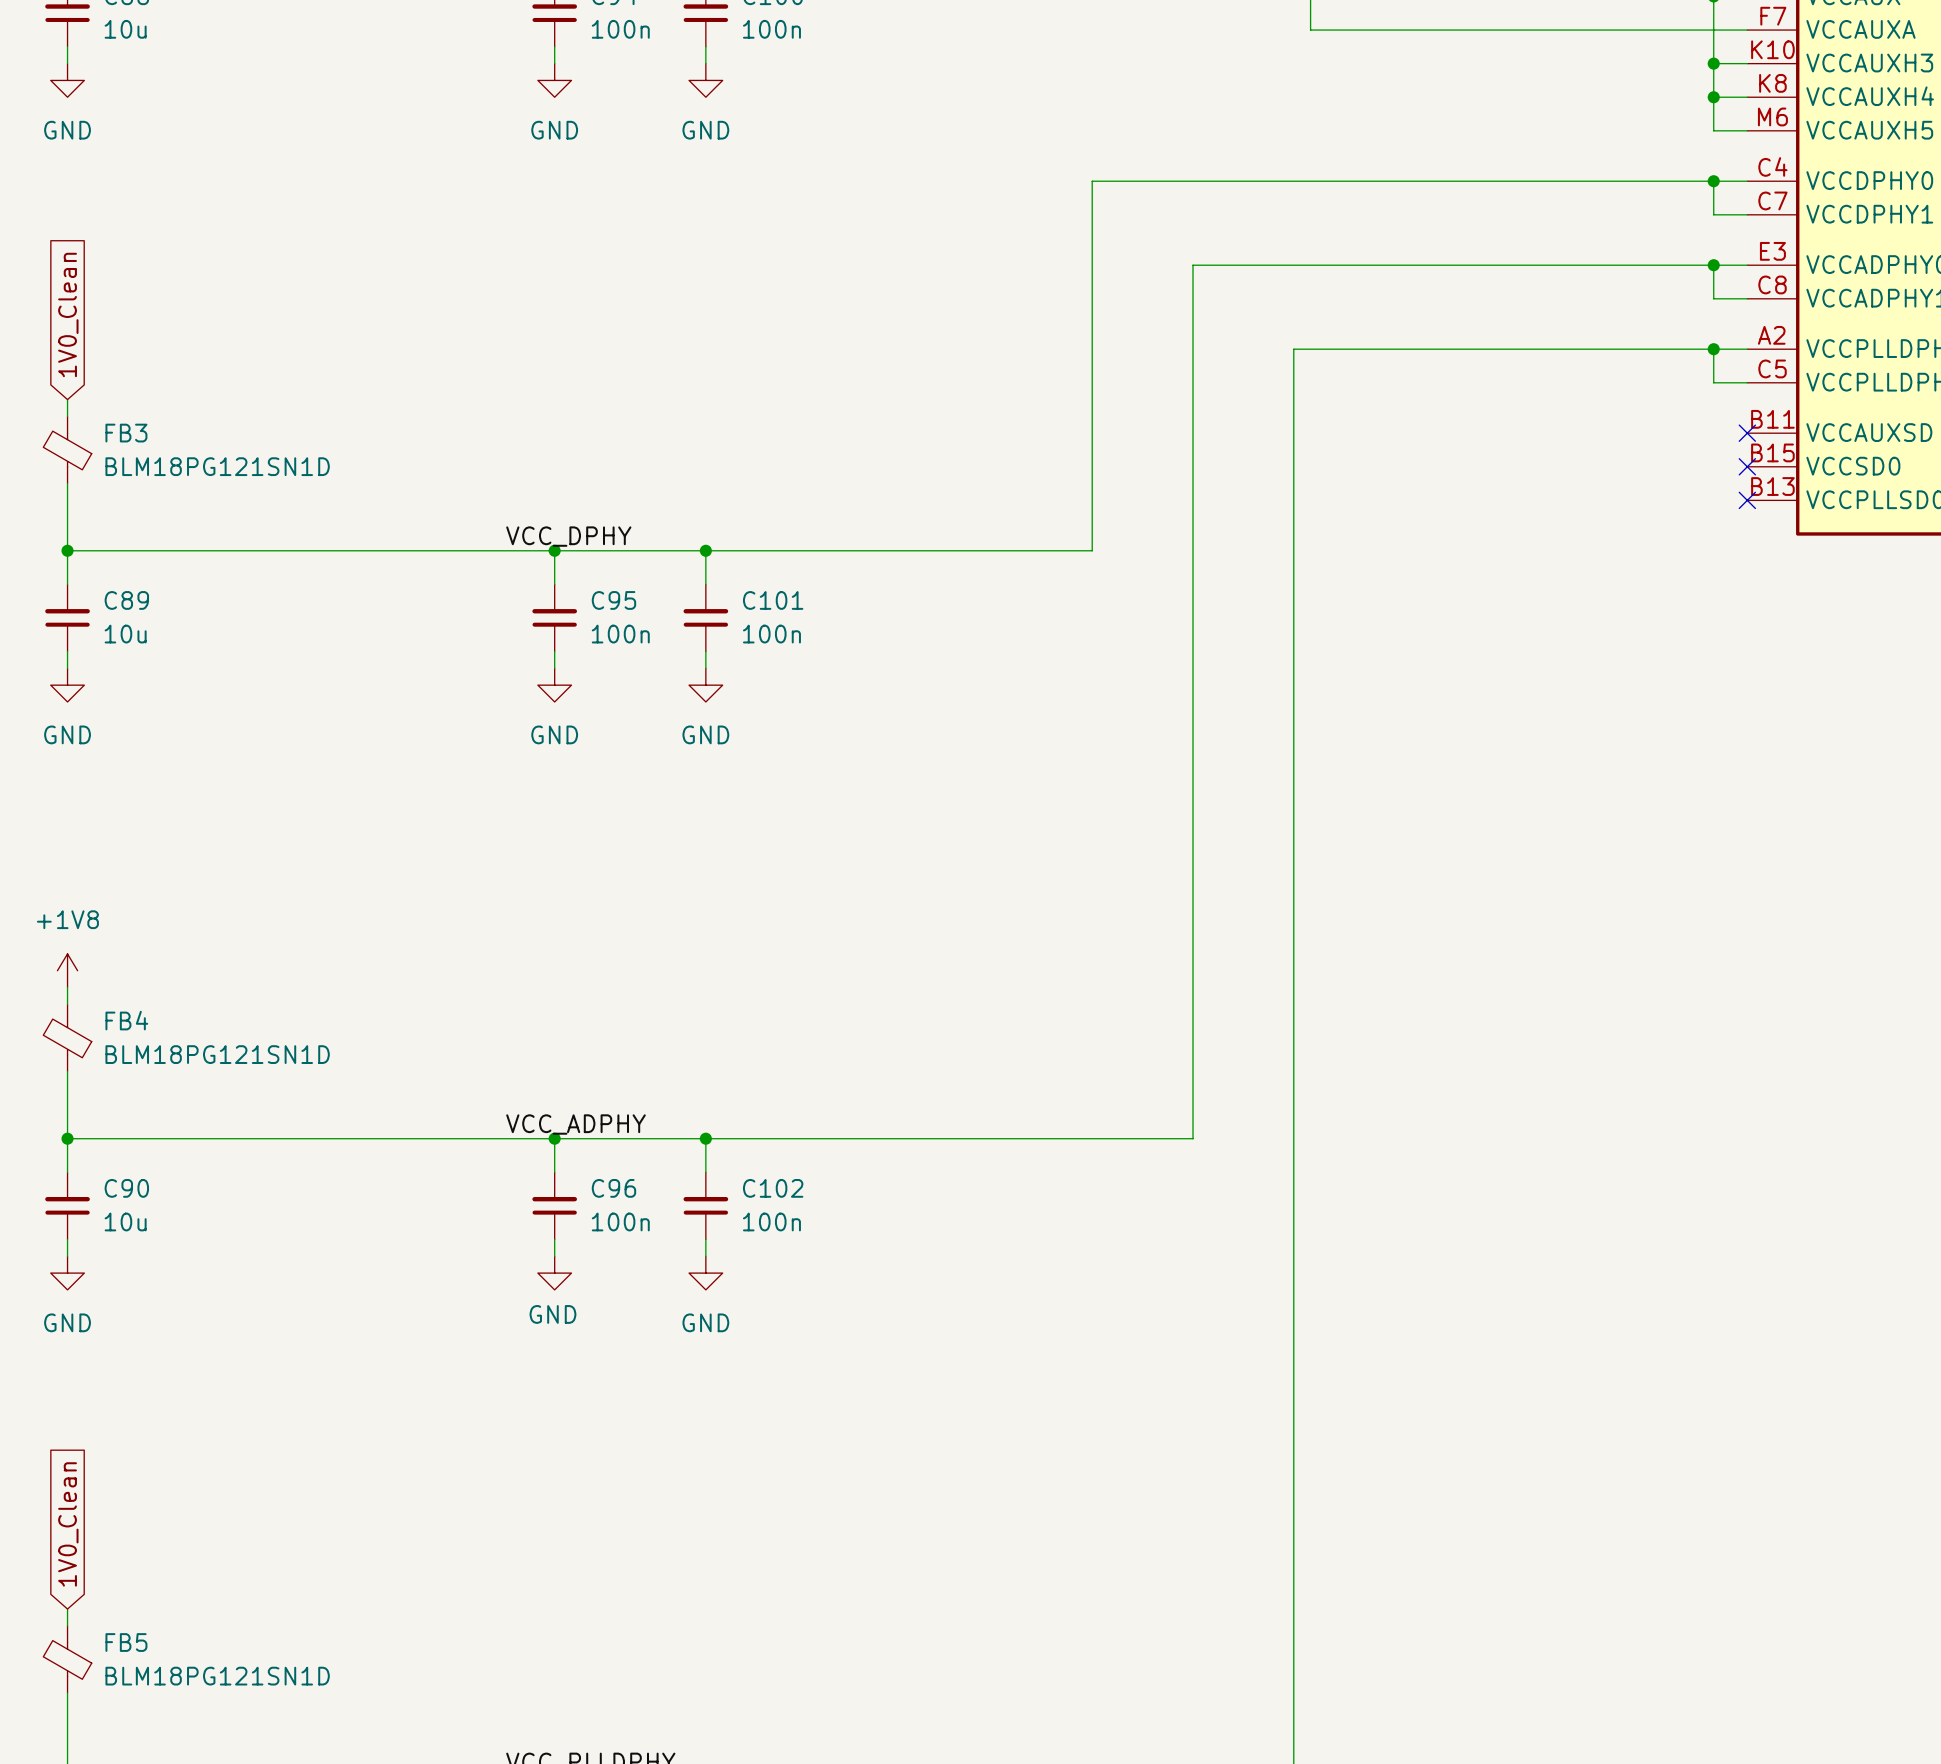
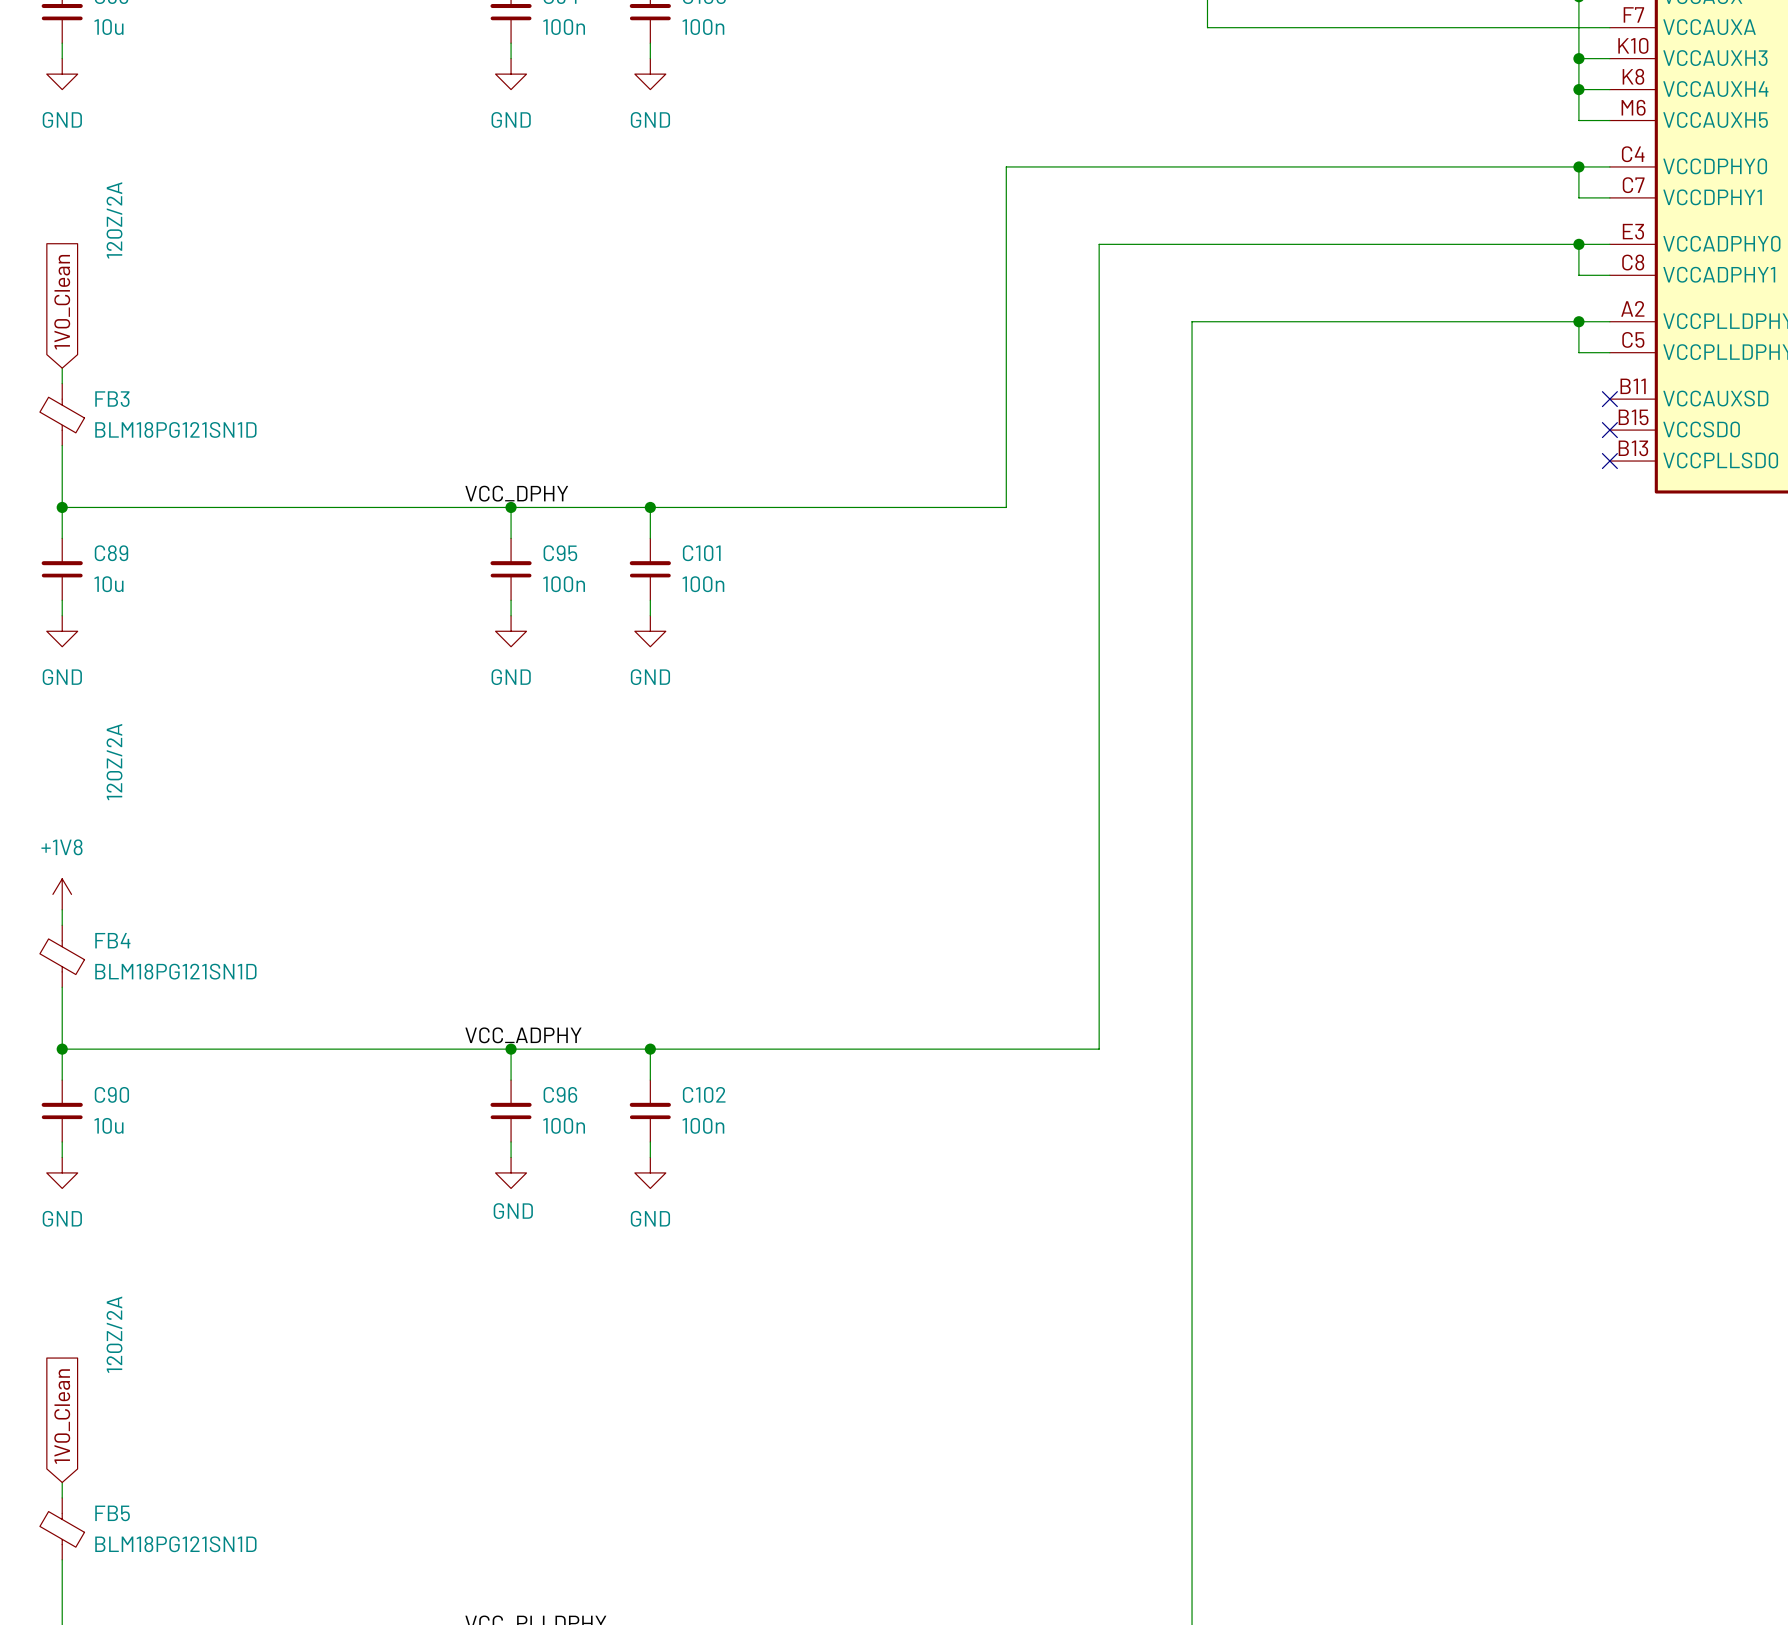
FB3 text: none -> 120Z/2A (114, 220)
FB4 text: none -> 120Z/2A (114, 762)
FB5 text: none -> 120Z/2A (114, 1334)

